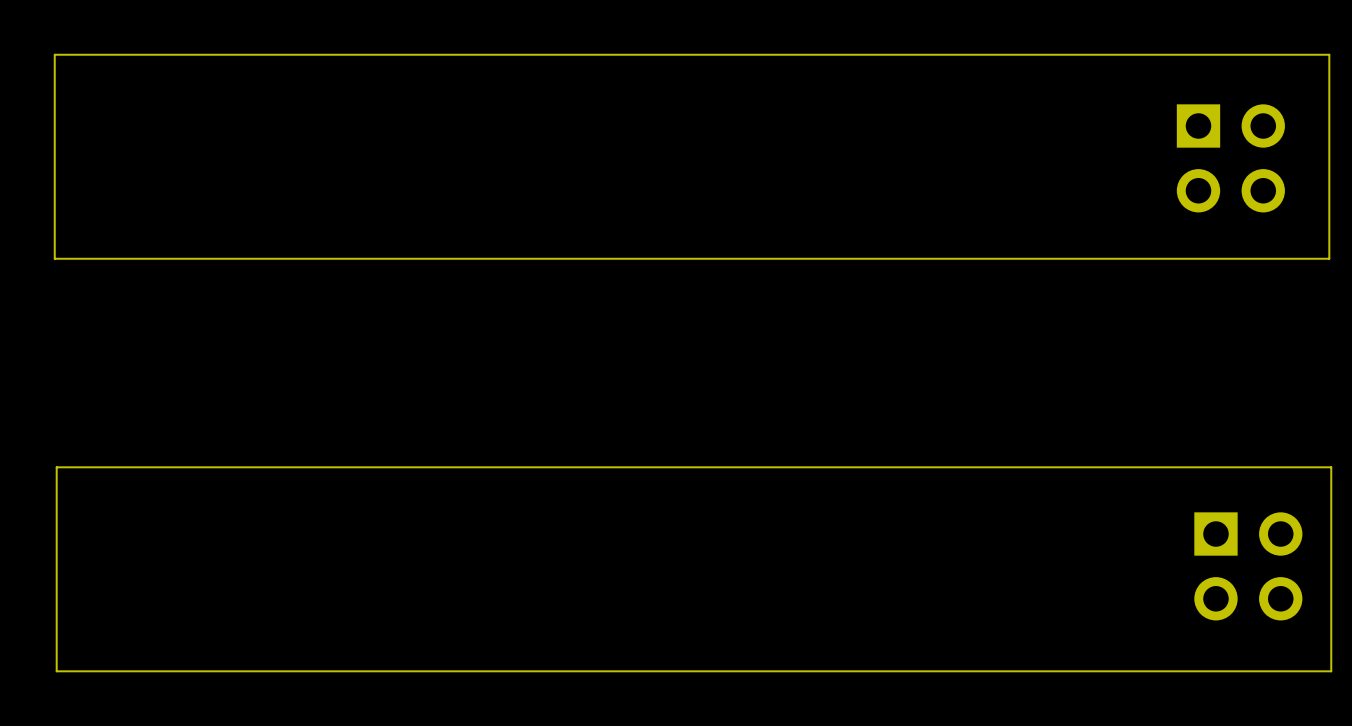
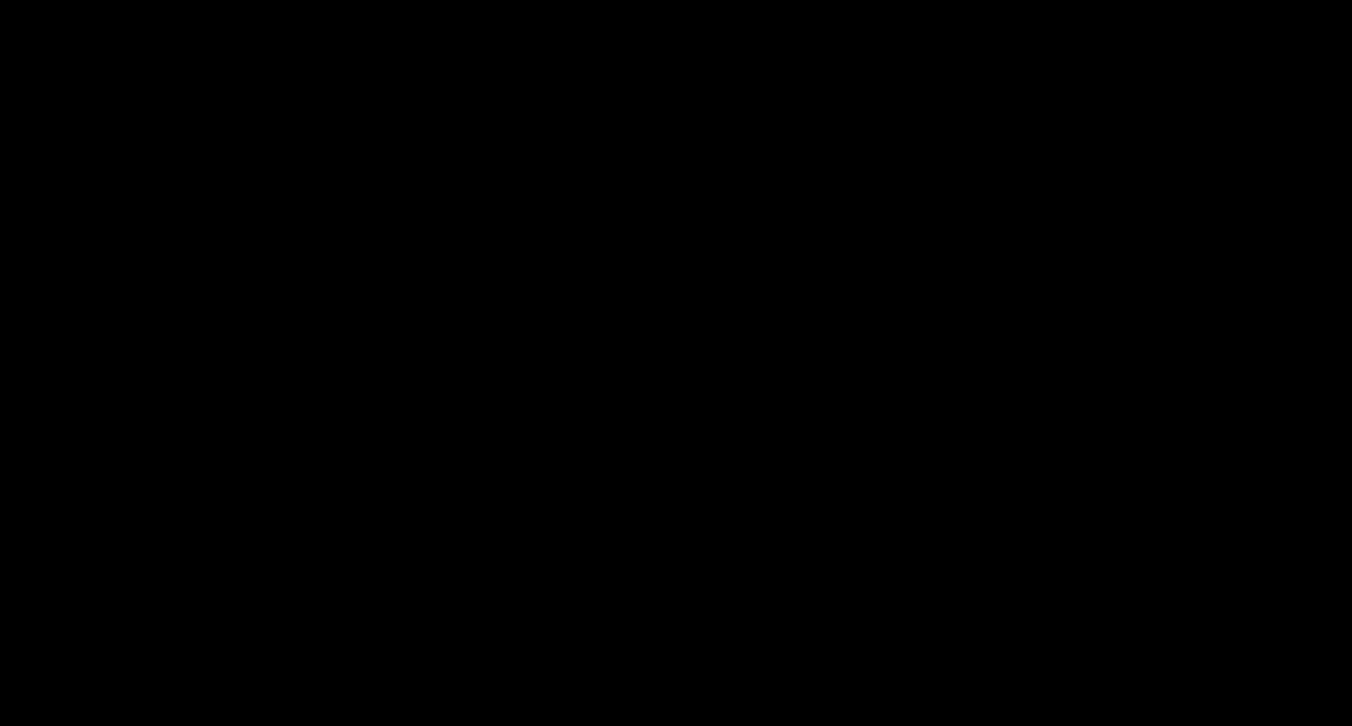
board edge: (1329, 54) (54, 54) (54, 258) (1329, 258) (1329, 54) -> none
part: (1230, 158) -> none
board edge: (1331, 467) (56, 467) (56, 671) (1331, 671) (1331, 467) -> none
part: (1248, 566) -> none

